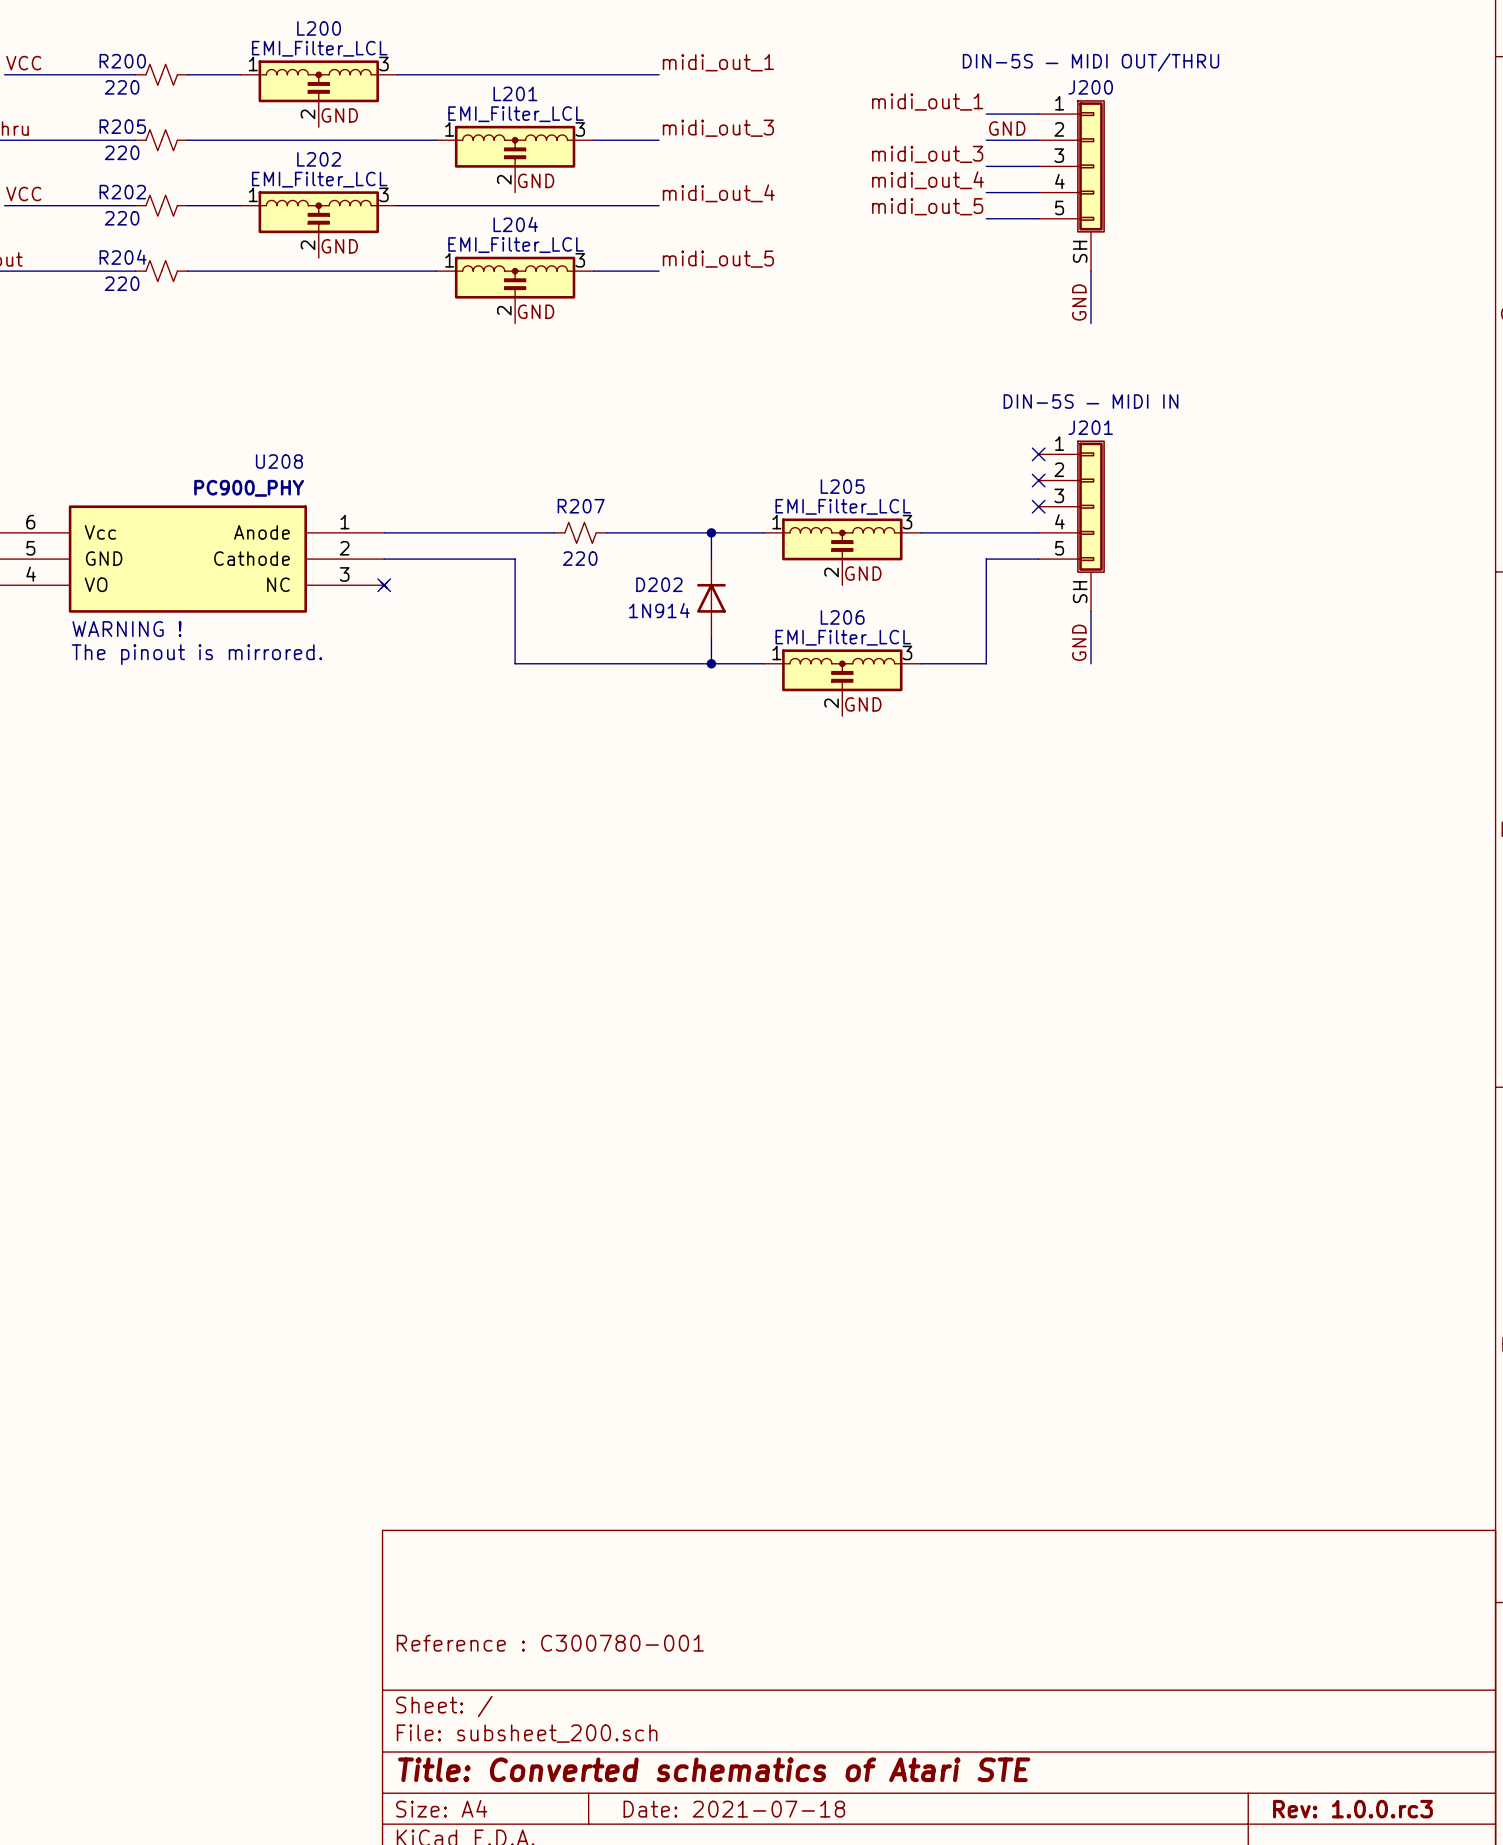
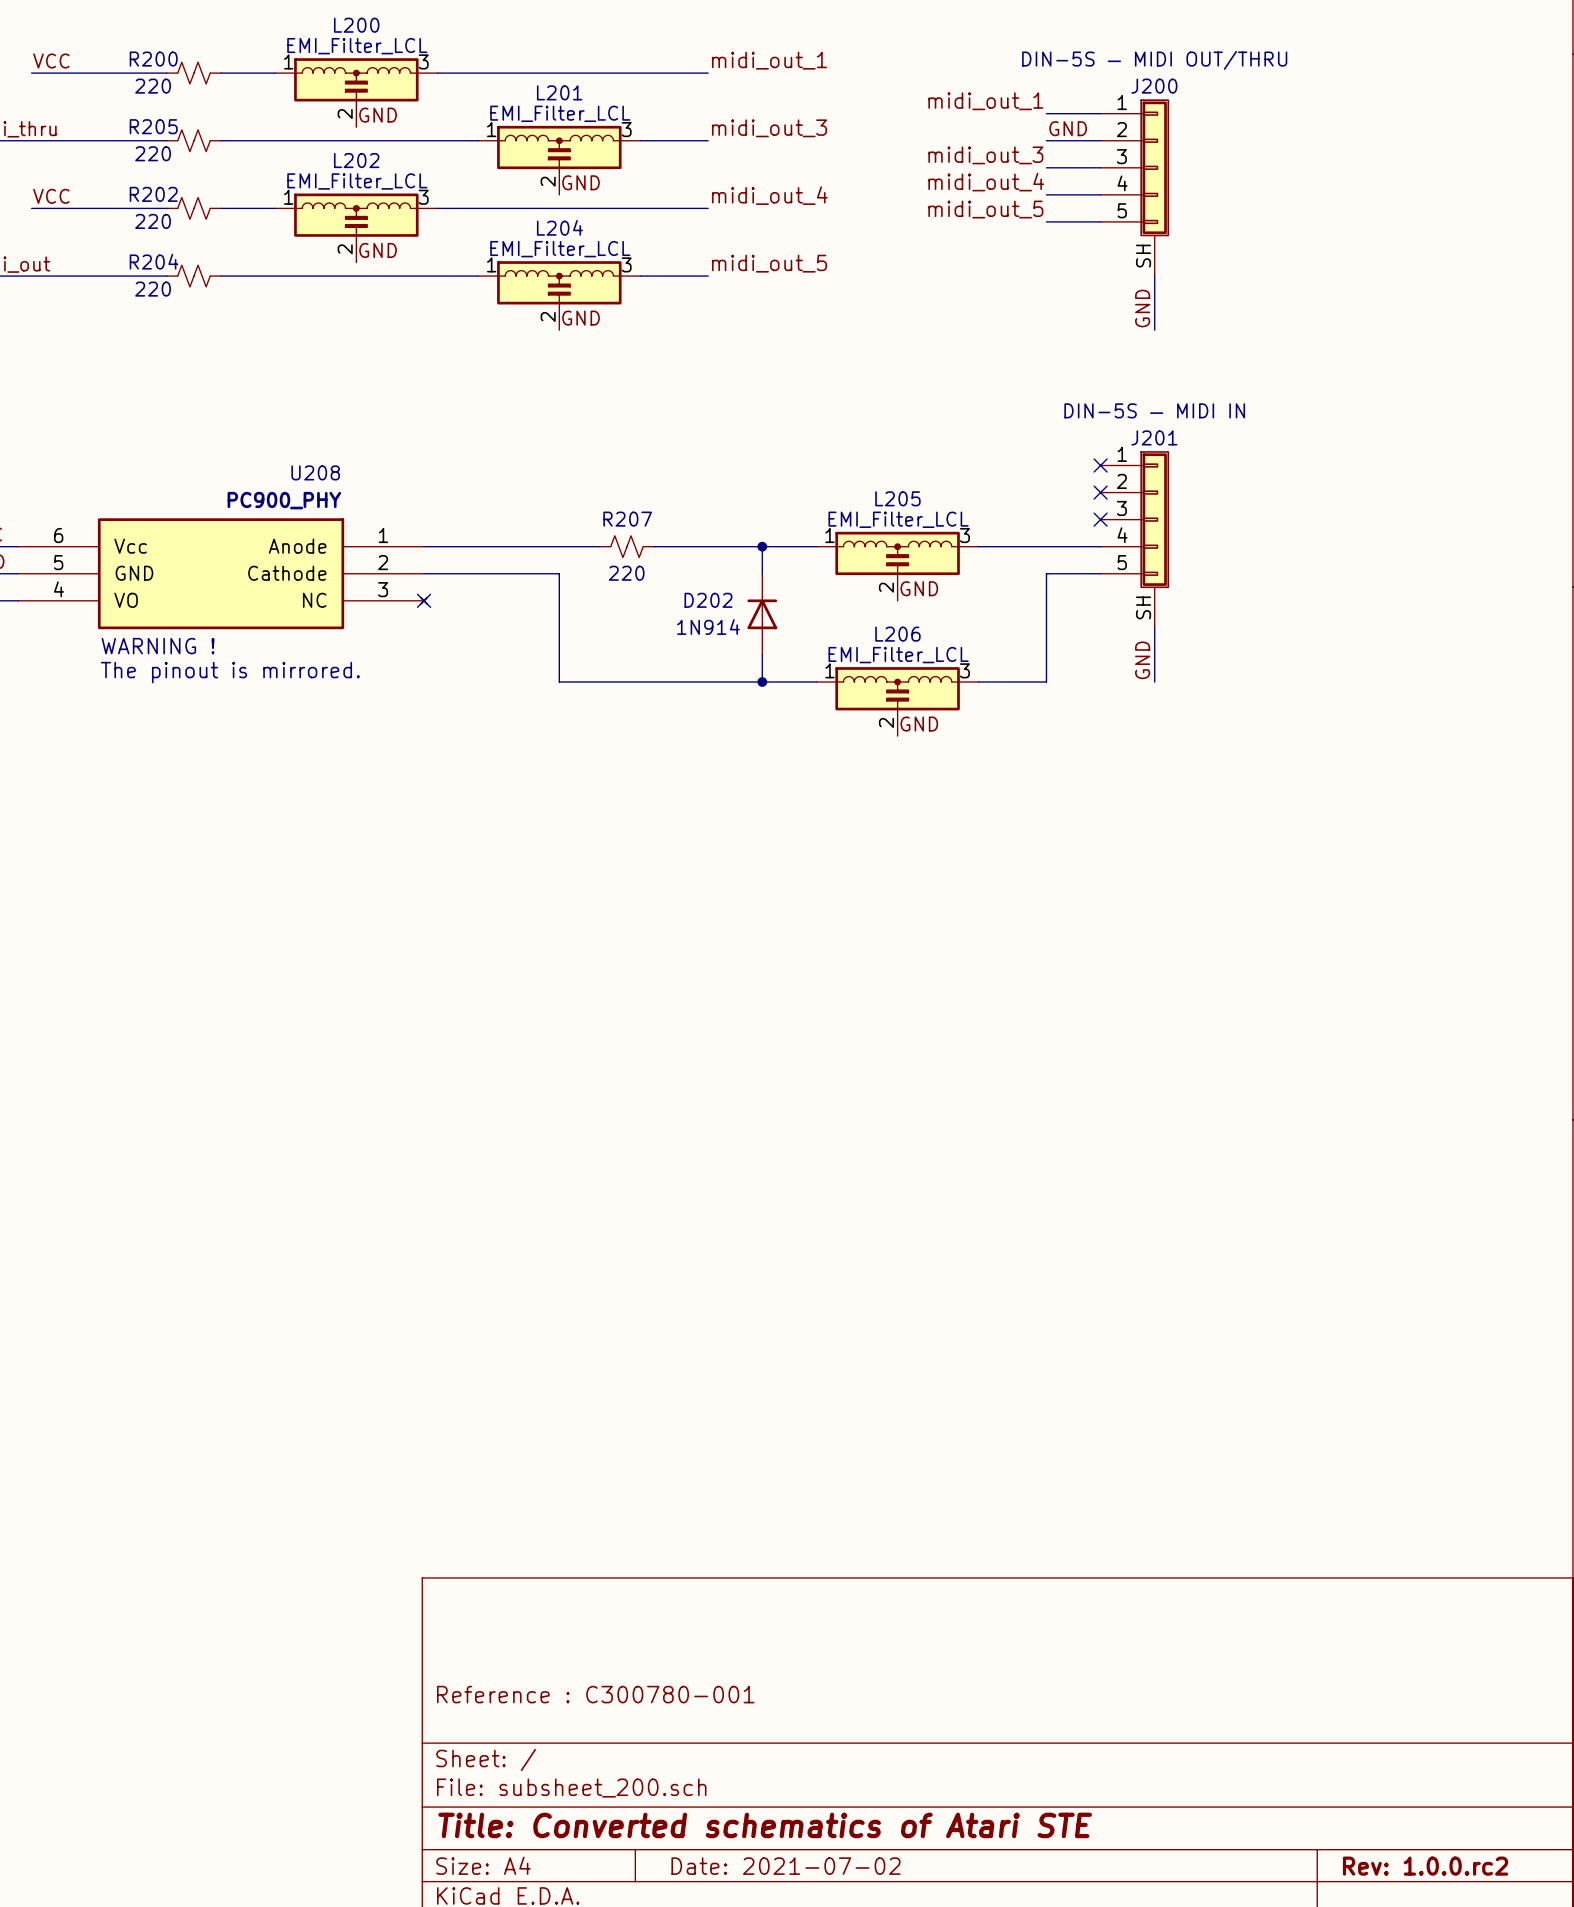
title block: Date: 2021-07-18 (734, 1809) -> Date: 2021-07-02 (785, 1866)
title block: Rev: 1.0.0.rc3 (1352, 1809) -> Rev: 1.0.0.rc2 (1425, 1866)

